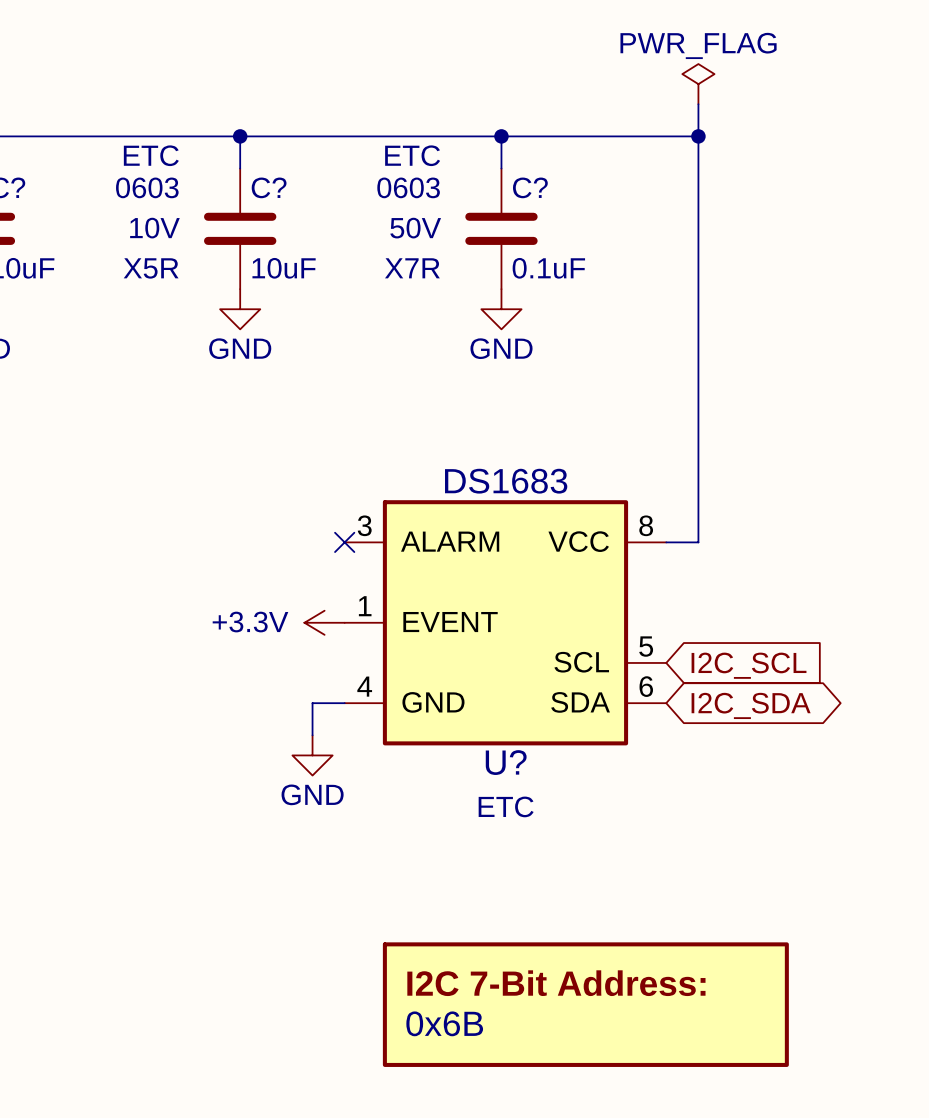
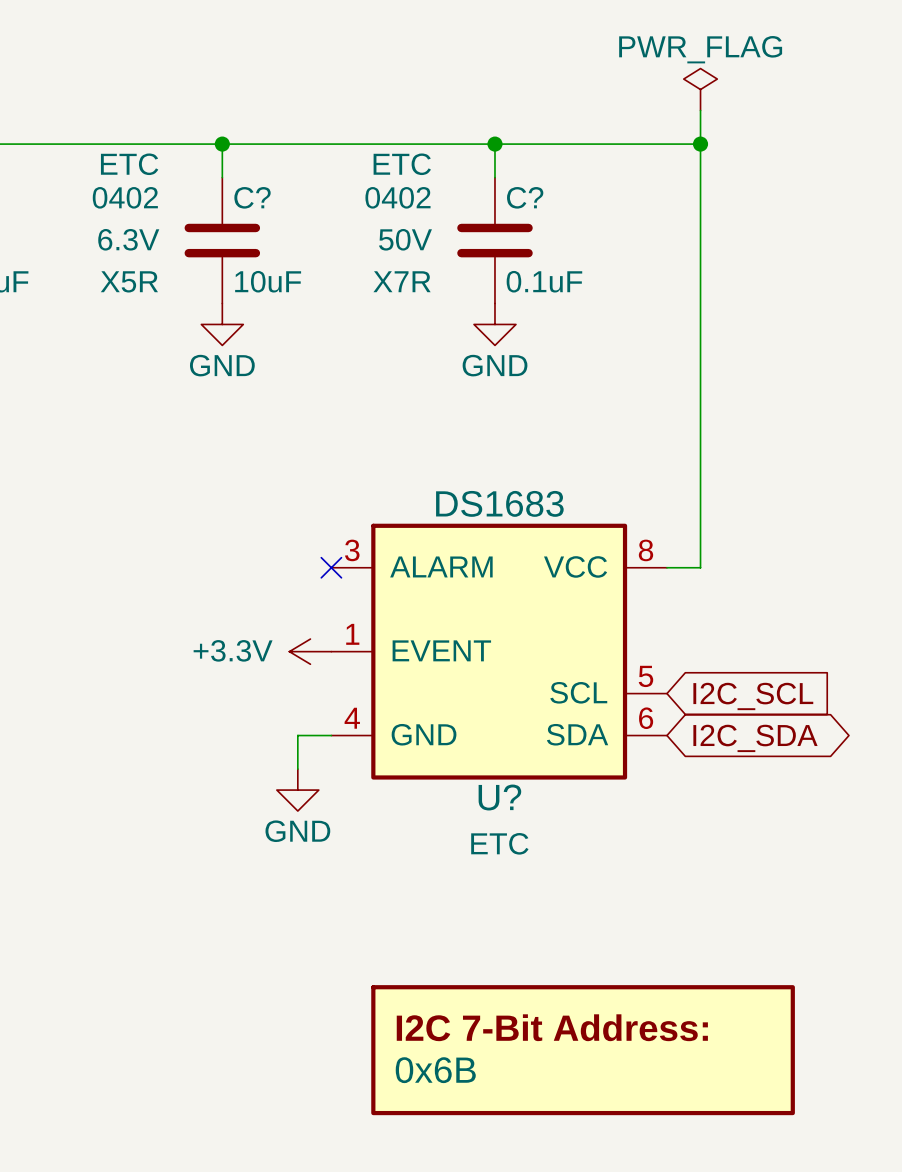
C? text: 0603 (147, 187) -> 0402 (125, 197)
C? text: 0603 (408, 187) -> 0402 (397, 197)
C? text: 10V (154, 228) -> 6.3V (128, 239)

